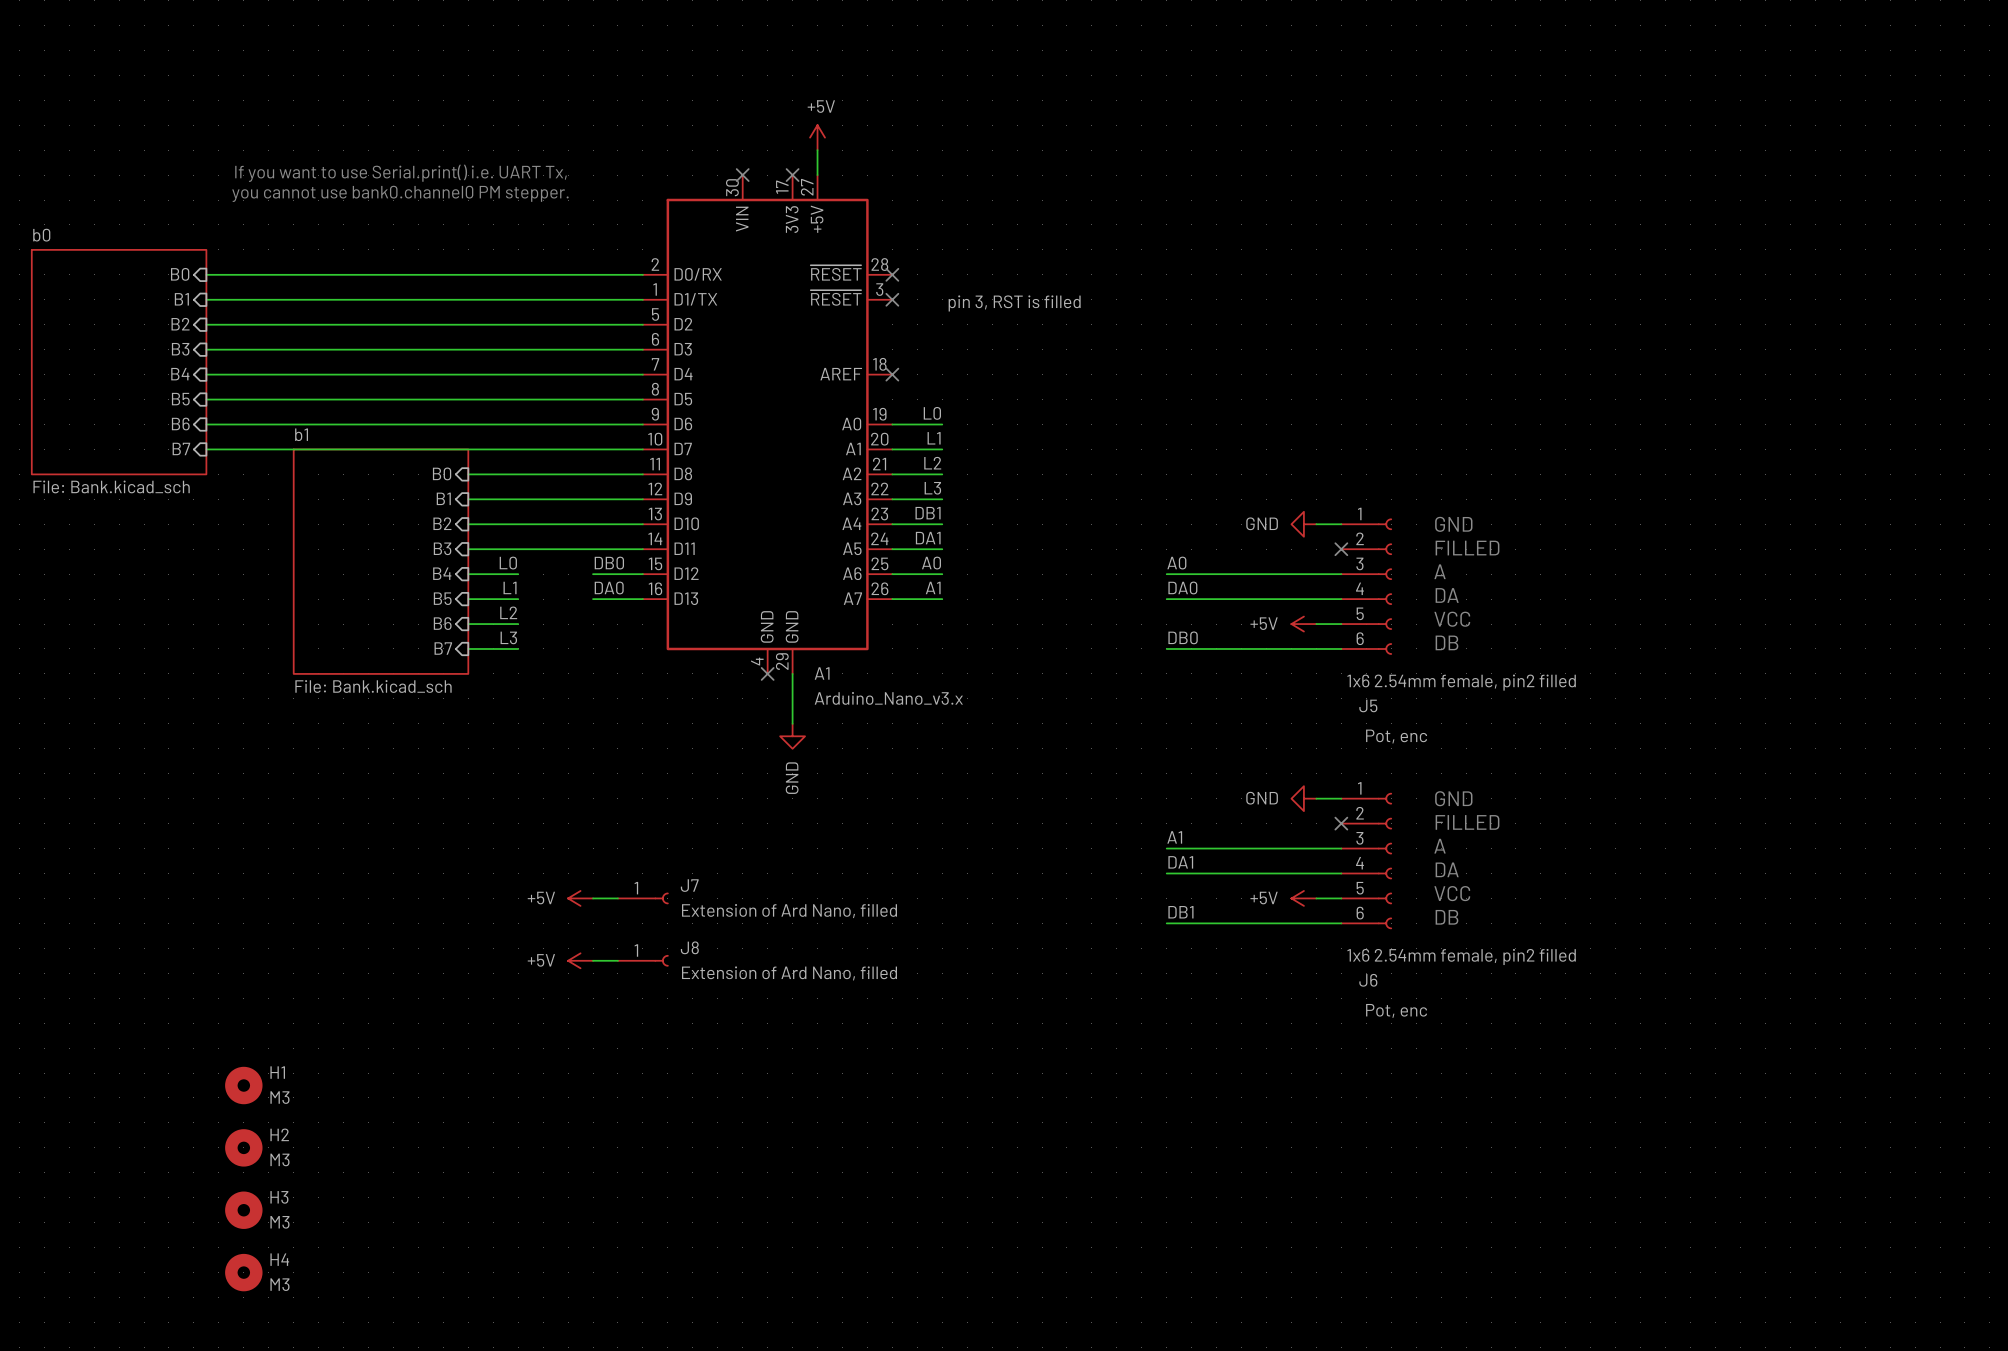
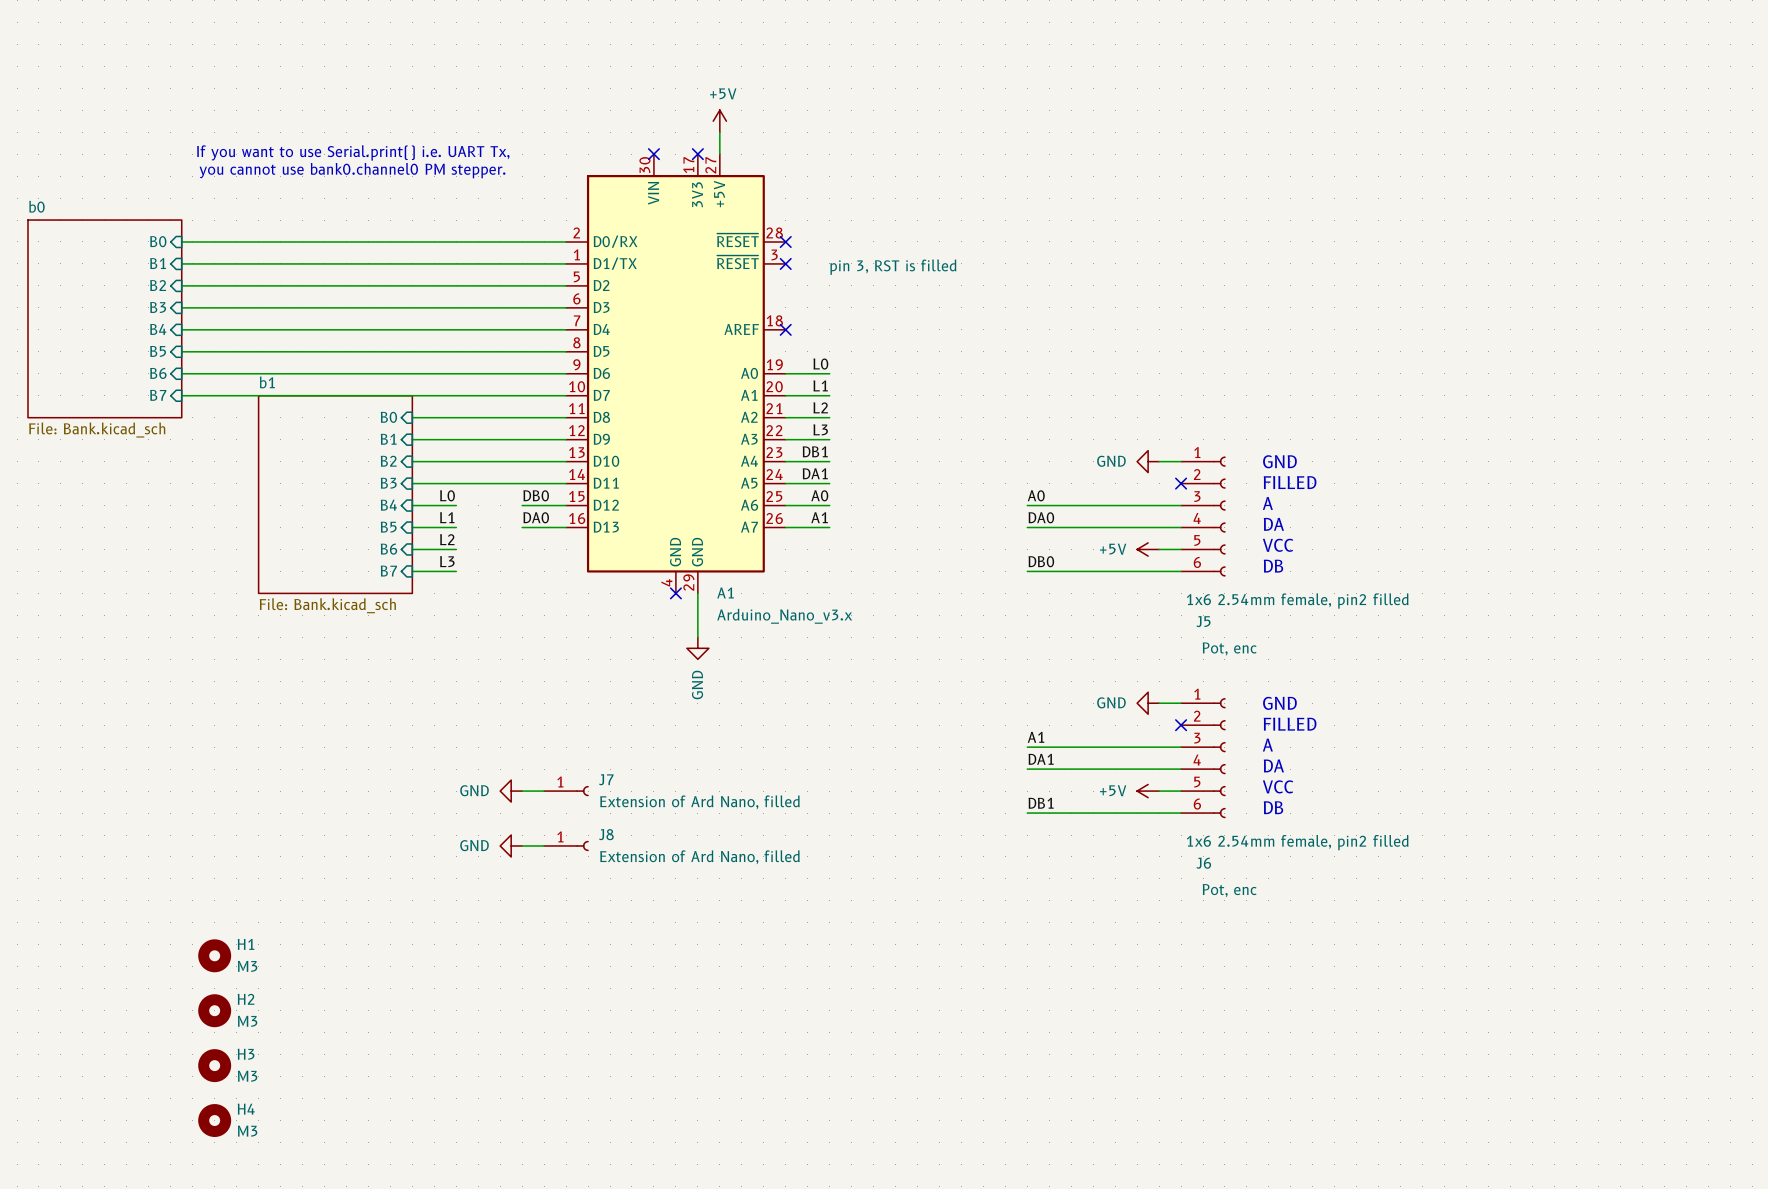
power symbol: +5V (580, 898) -> GND (511, 791)
power symbol: +5V (580, 960) -> GND (511, 845)

